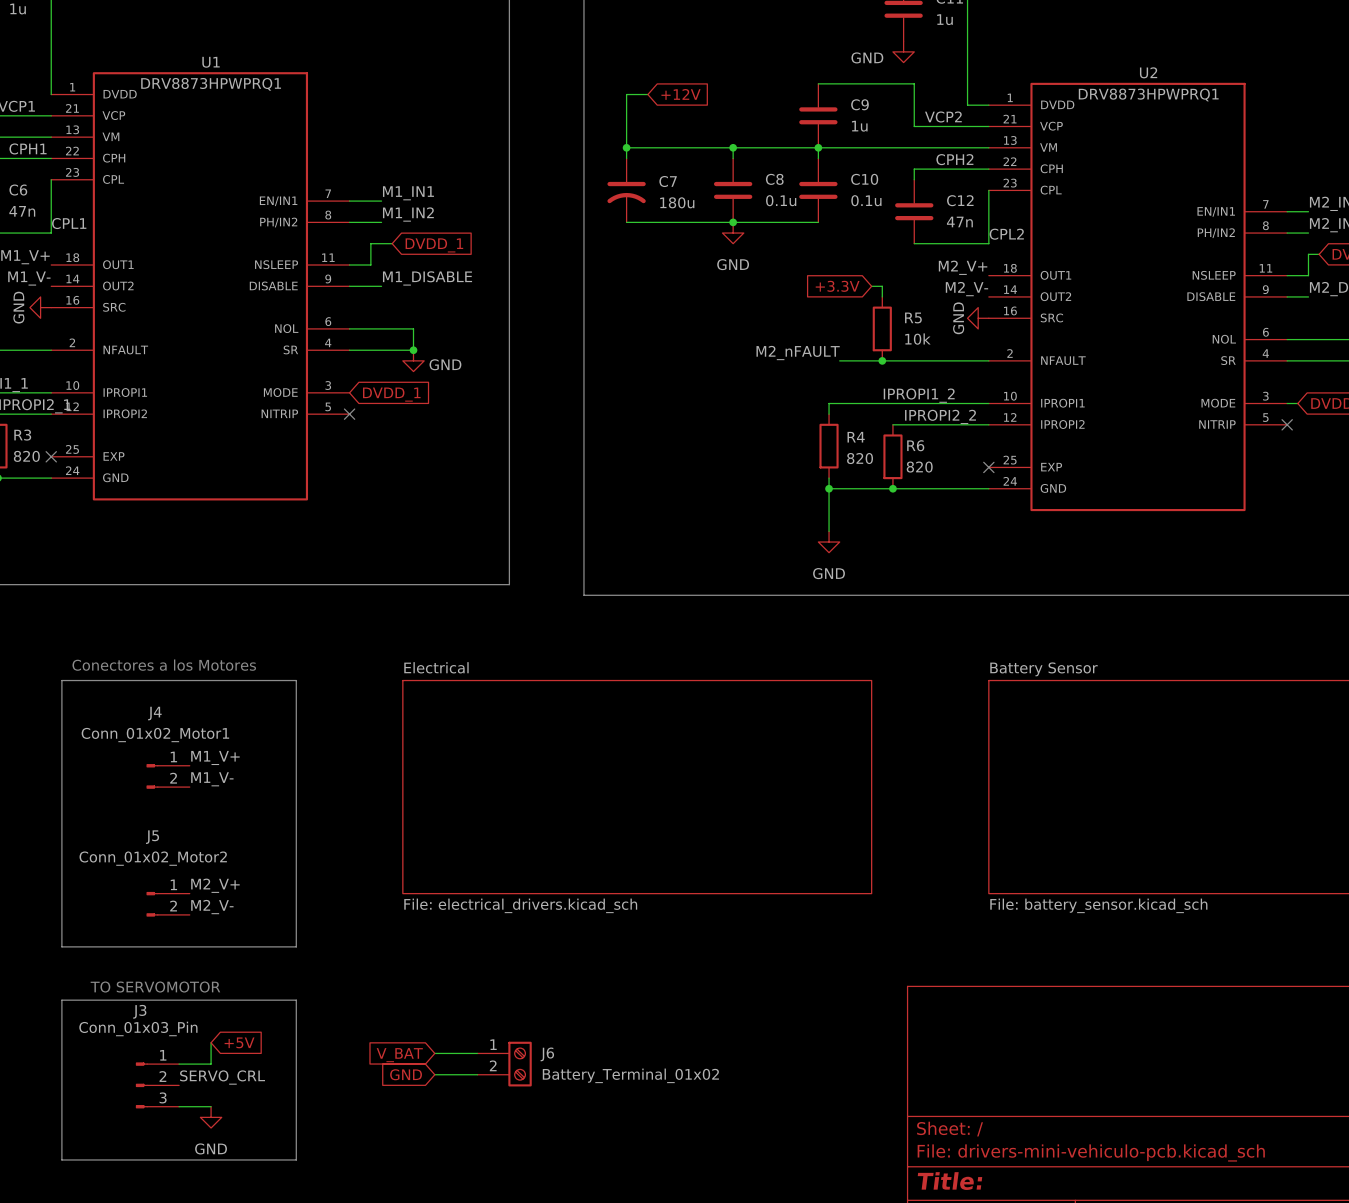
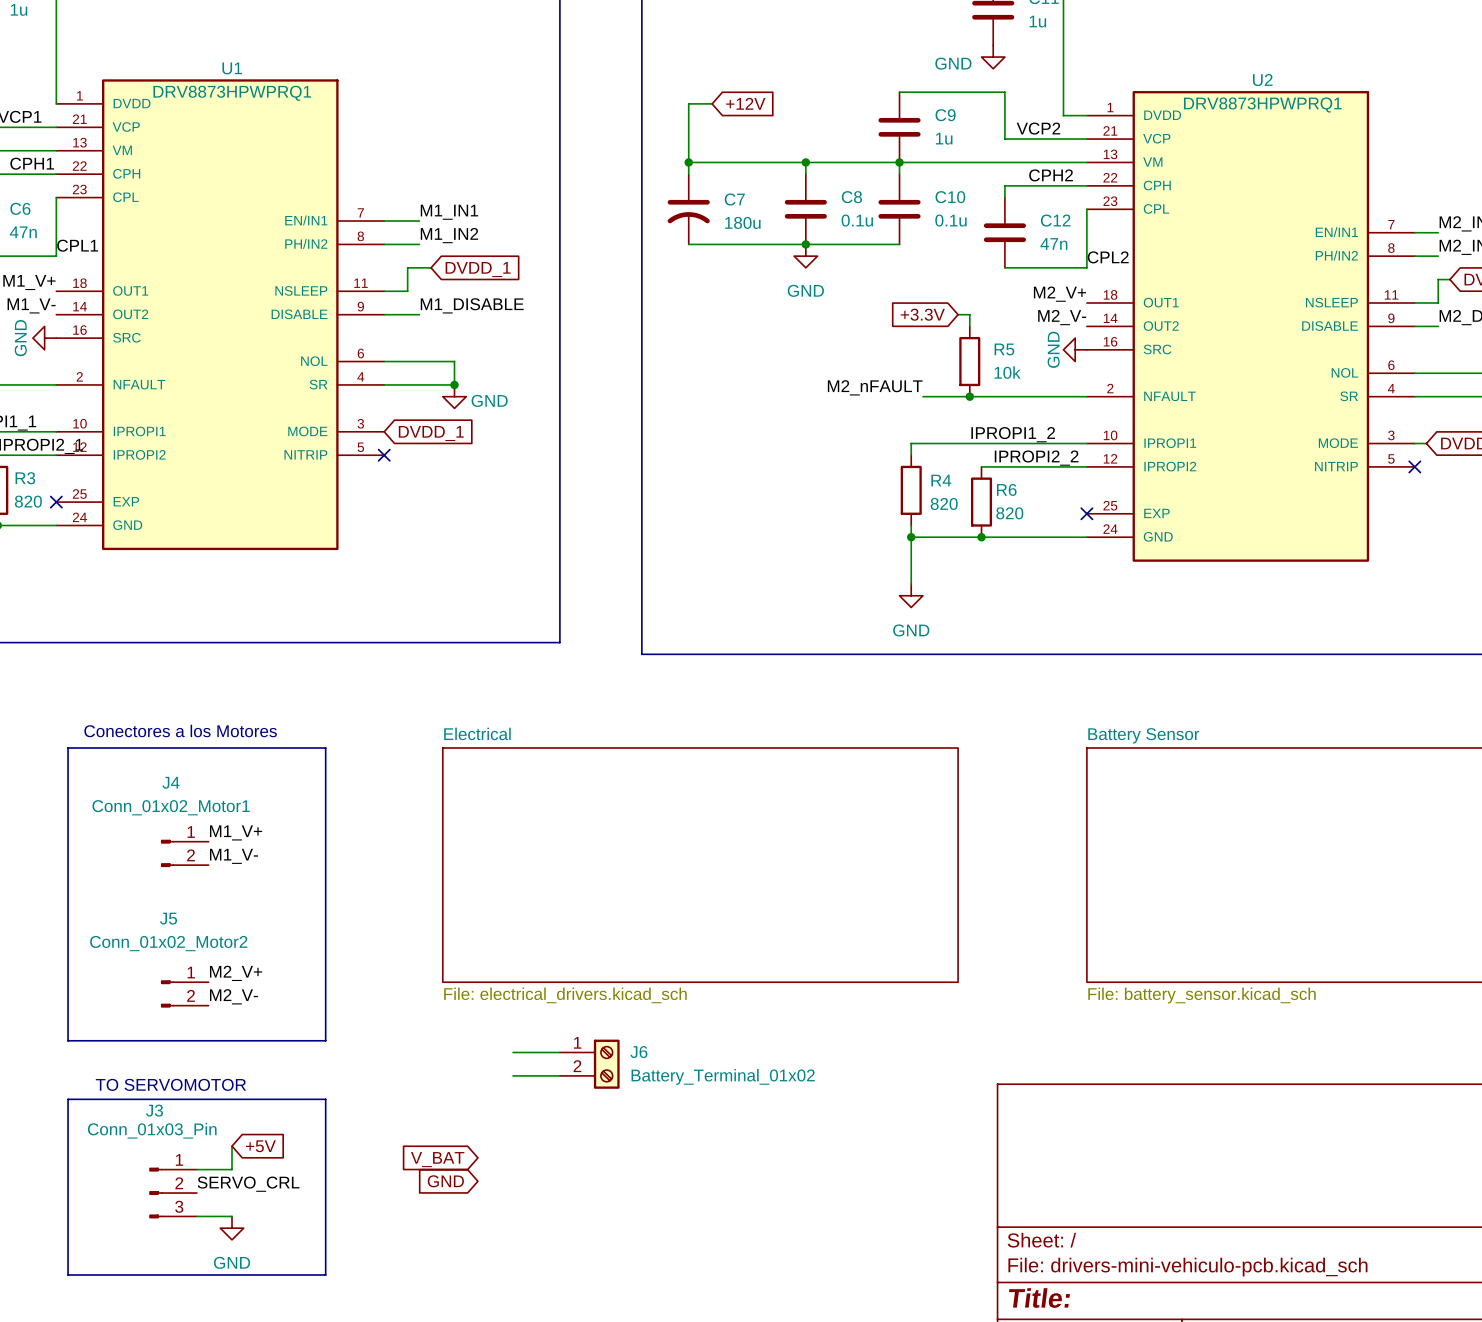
wire: (434, 1053) (477, 1053) -> (513, 1052) (559, 1052)
J6 position: (504, 1064) -> (589, 1064)
wire: (434, 1074) (477, 1074) -> (513, 1075) (559, 1075)

